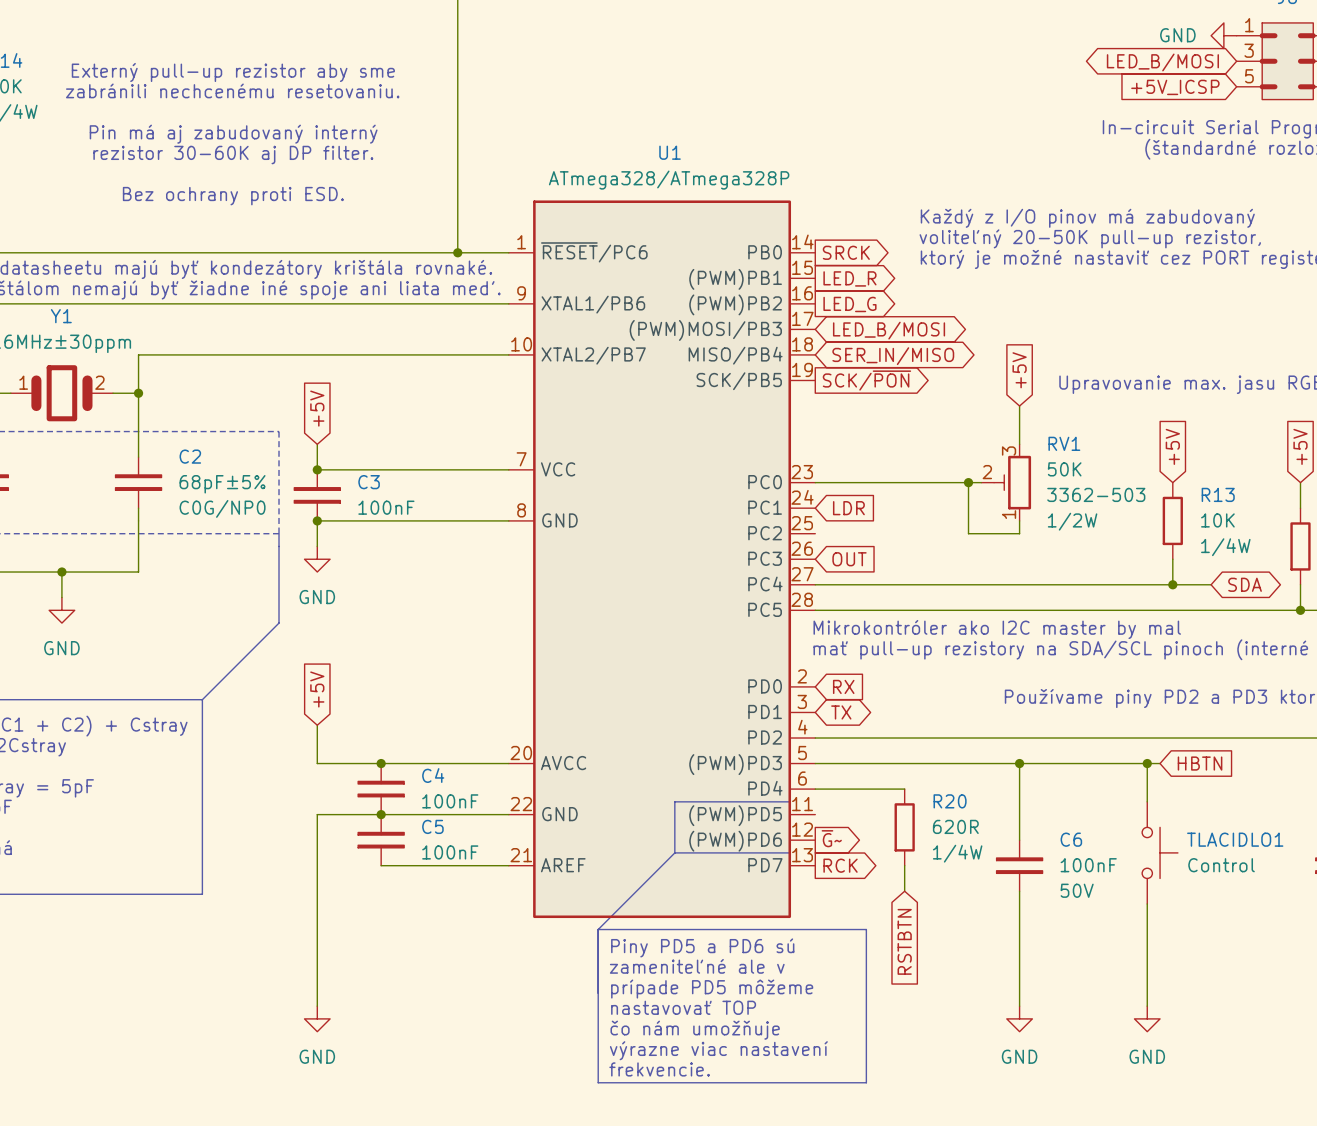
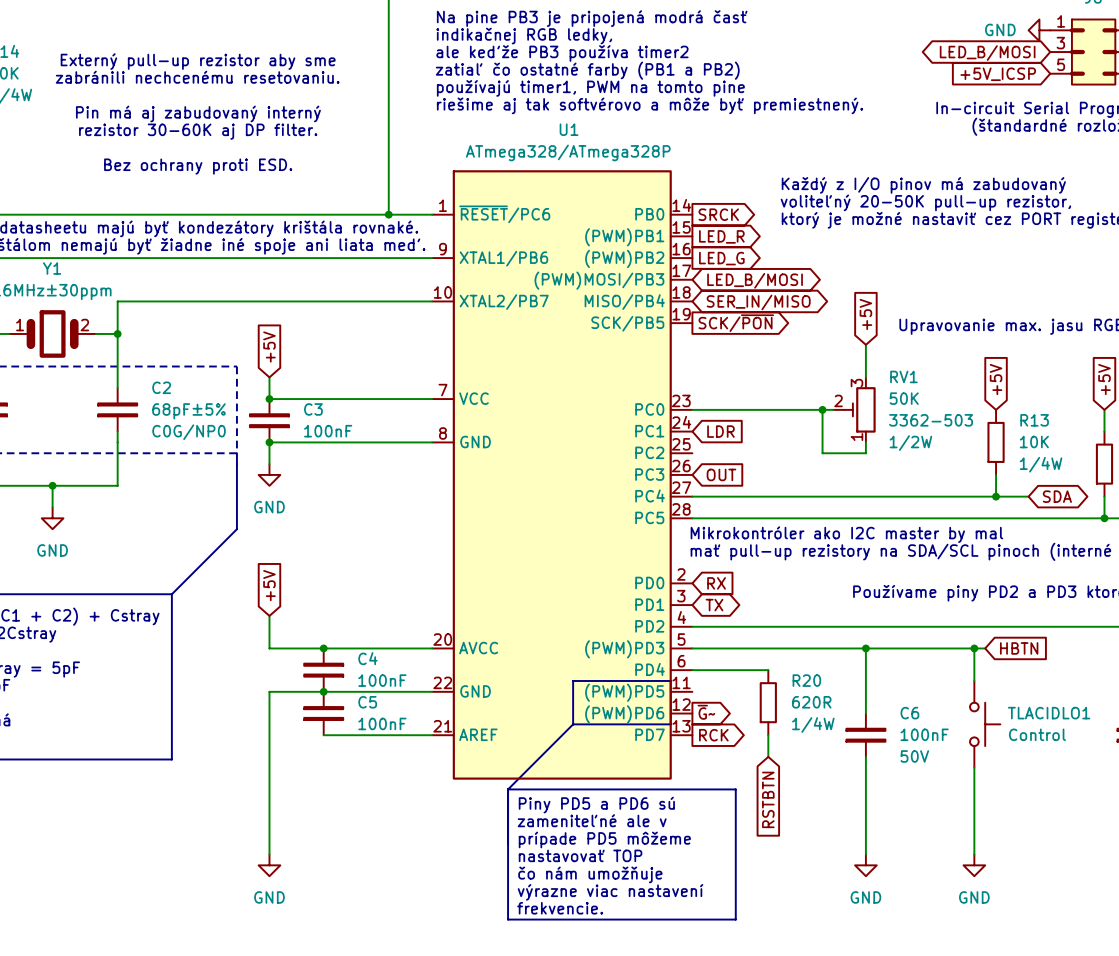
text: none -> Na pine PB3 je pripojená modrá časť (592, 18)
text: none -> indikačnej RGB ledky, (524, 36)
text: none -> ale keďže PB3 používa timer2 (562, 53)
text: none -> zatiaľ čo ostatné farby (PB1 a PB2) (587, 70)
text: none -> používajú timer1, PWM na tomto pine (590, 88)
text: none -> riešime aj tak softvérovo a môže byť premiestnený. (649, 105)

